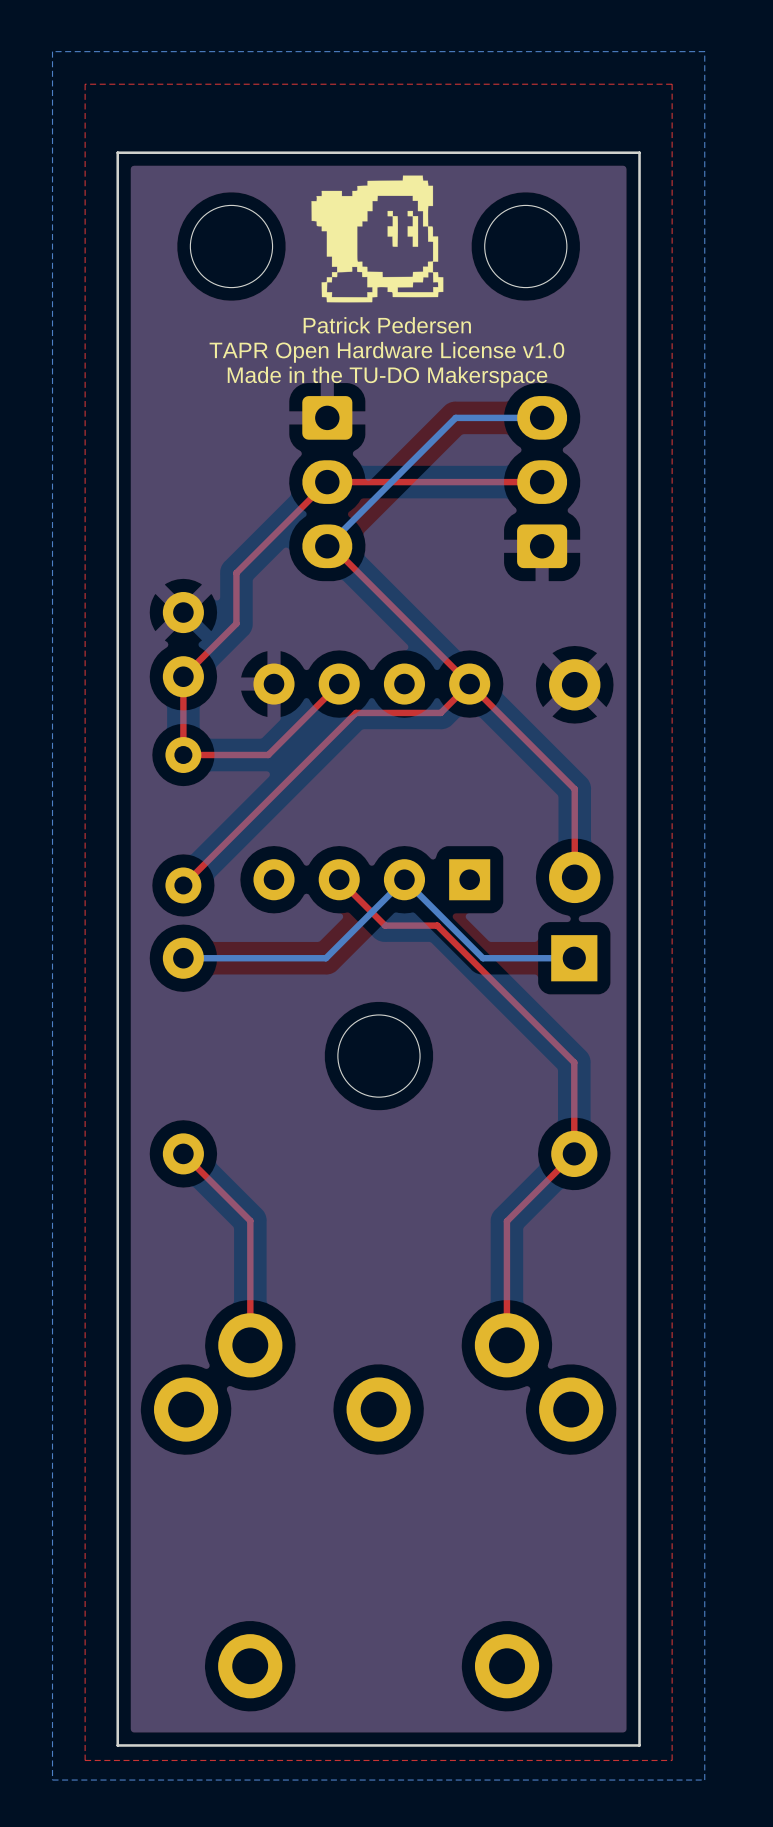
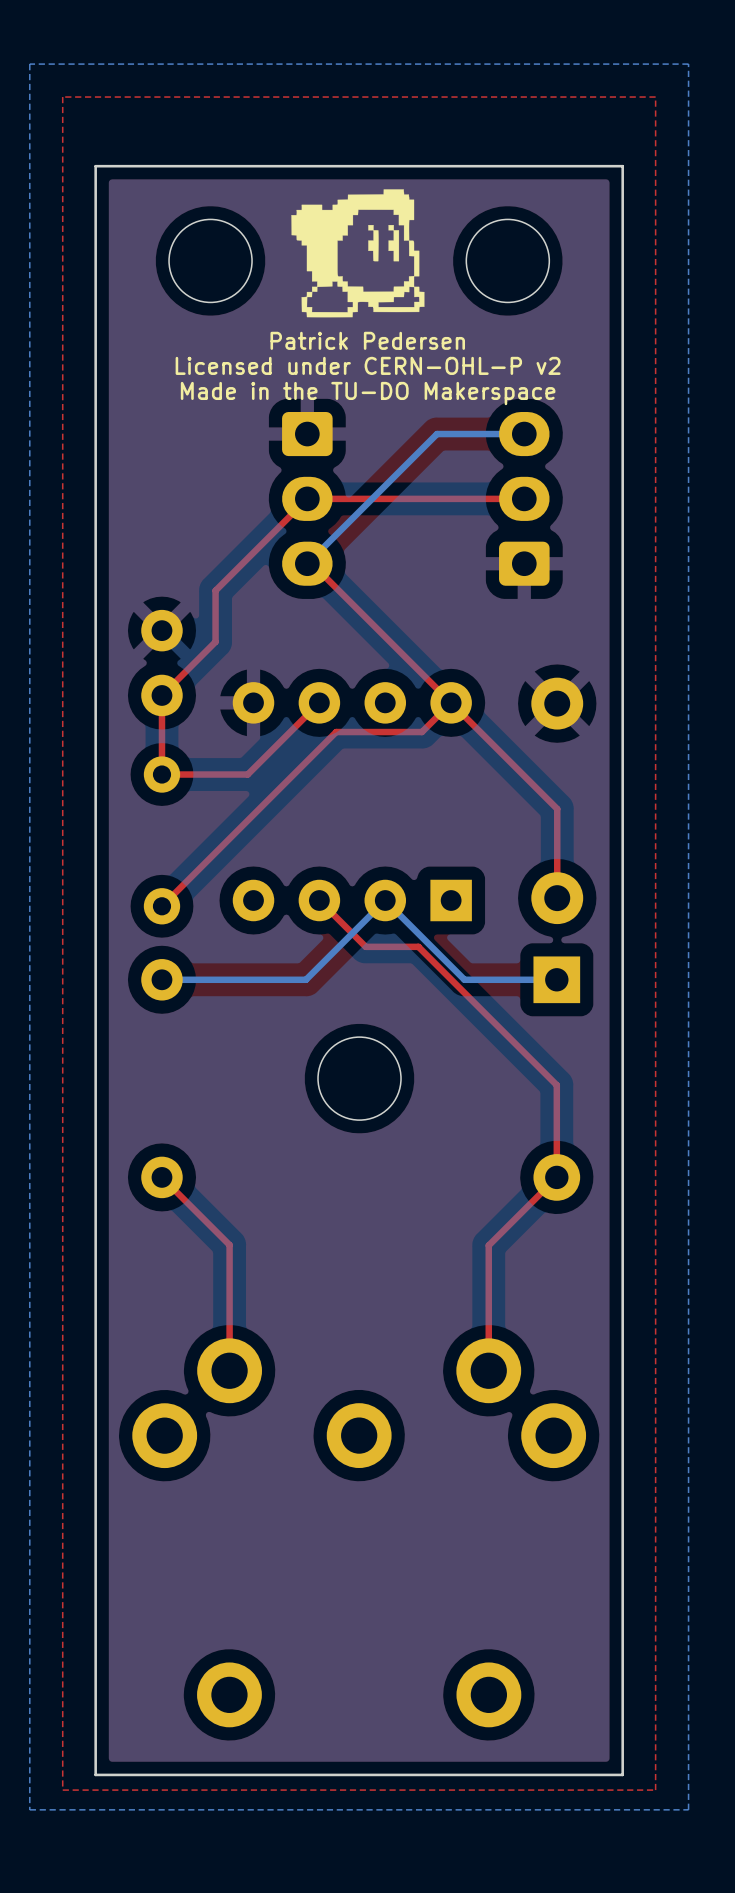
text: TAPR Open Hardware License v1.0 (386, 352) -> Licensed under CERN-OHL-P v2 (368, 365)

